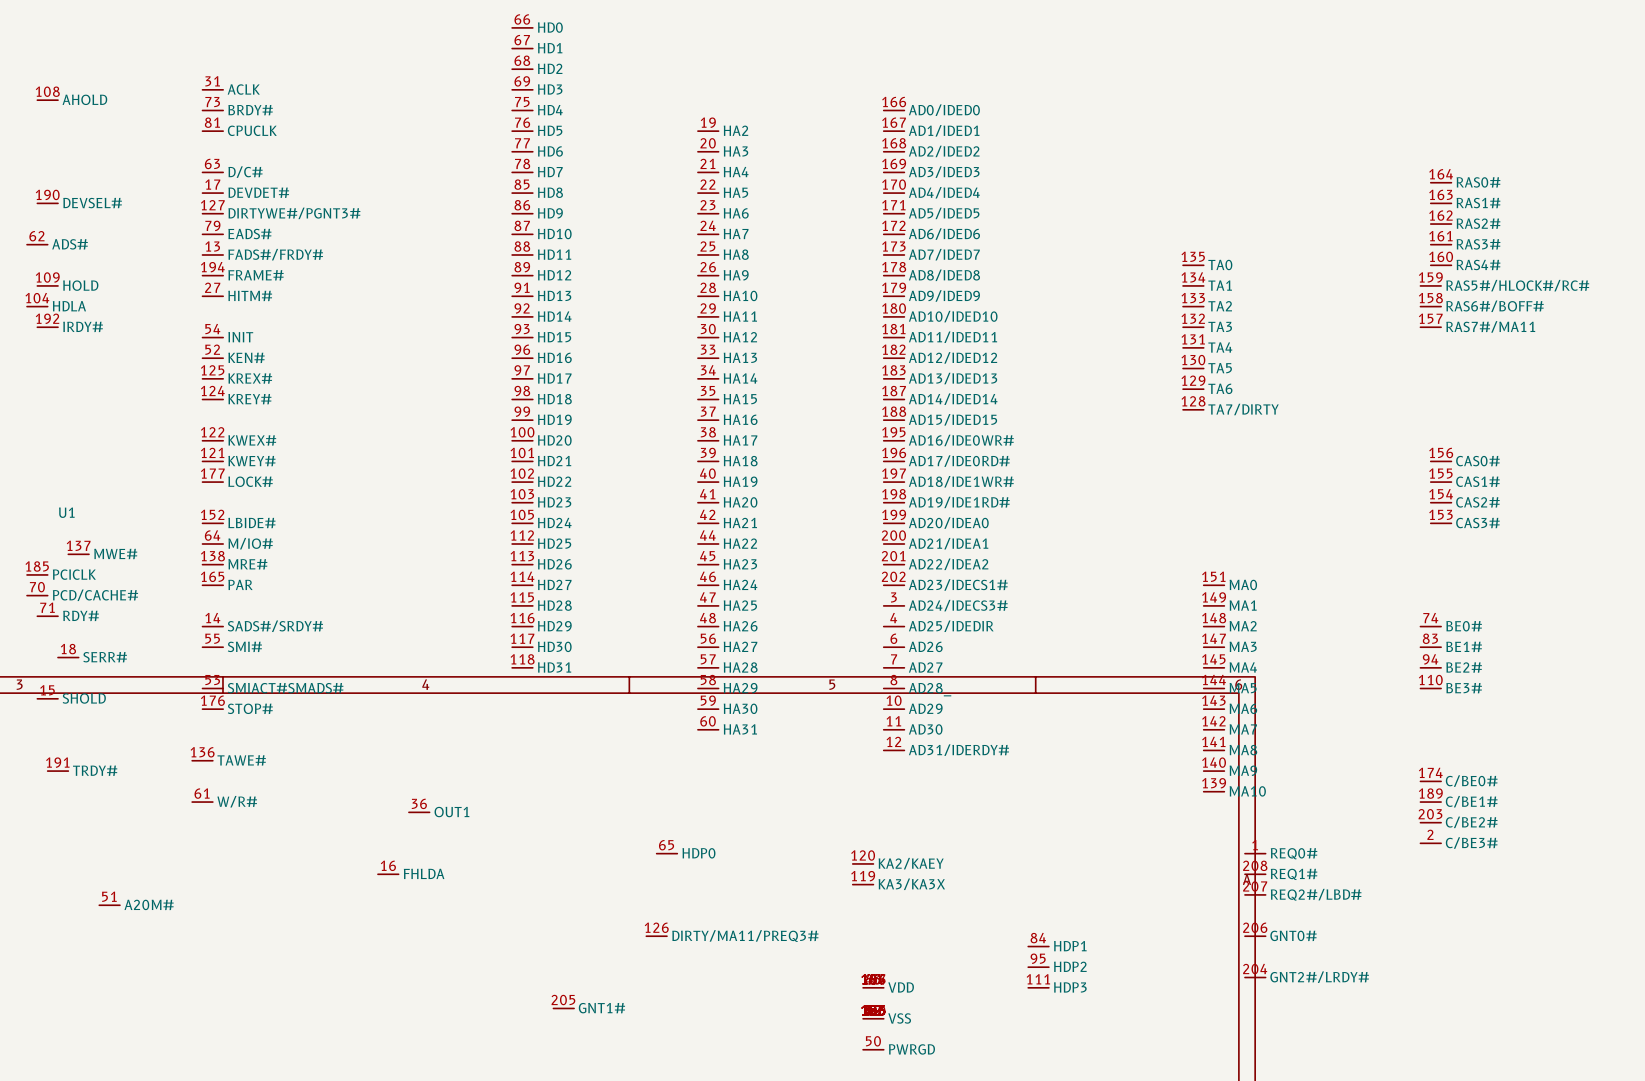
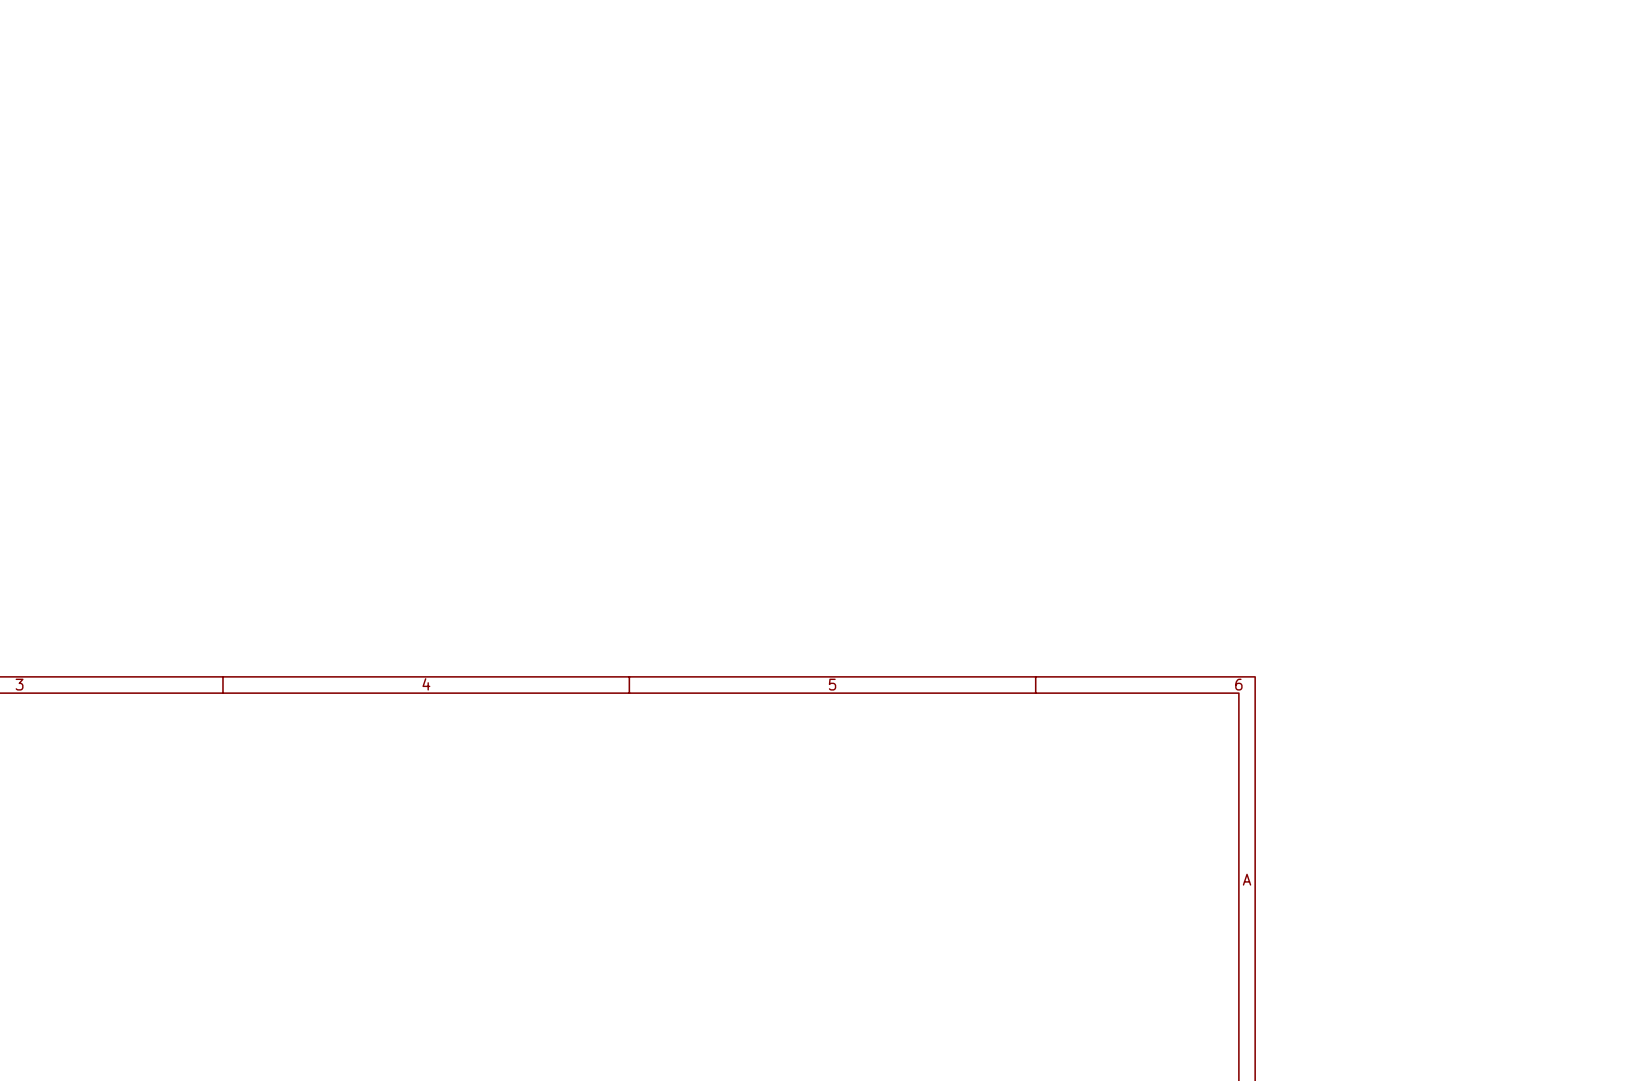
U1: (739, 538) -> none

